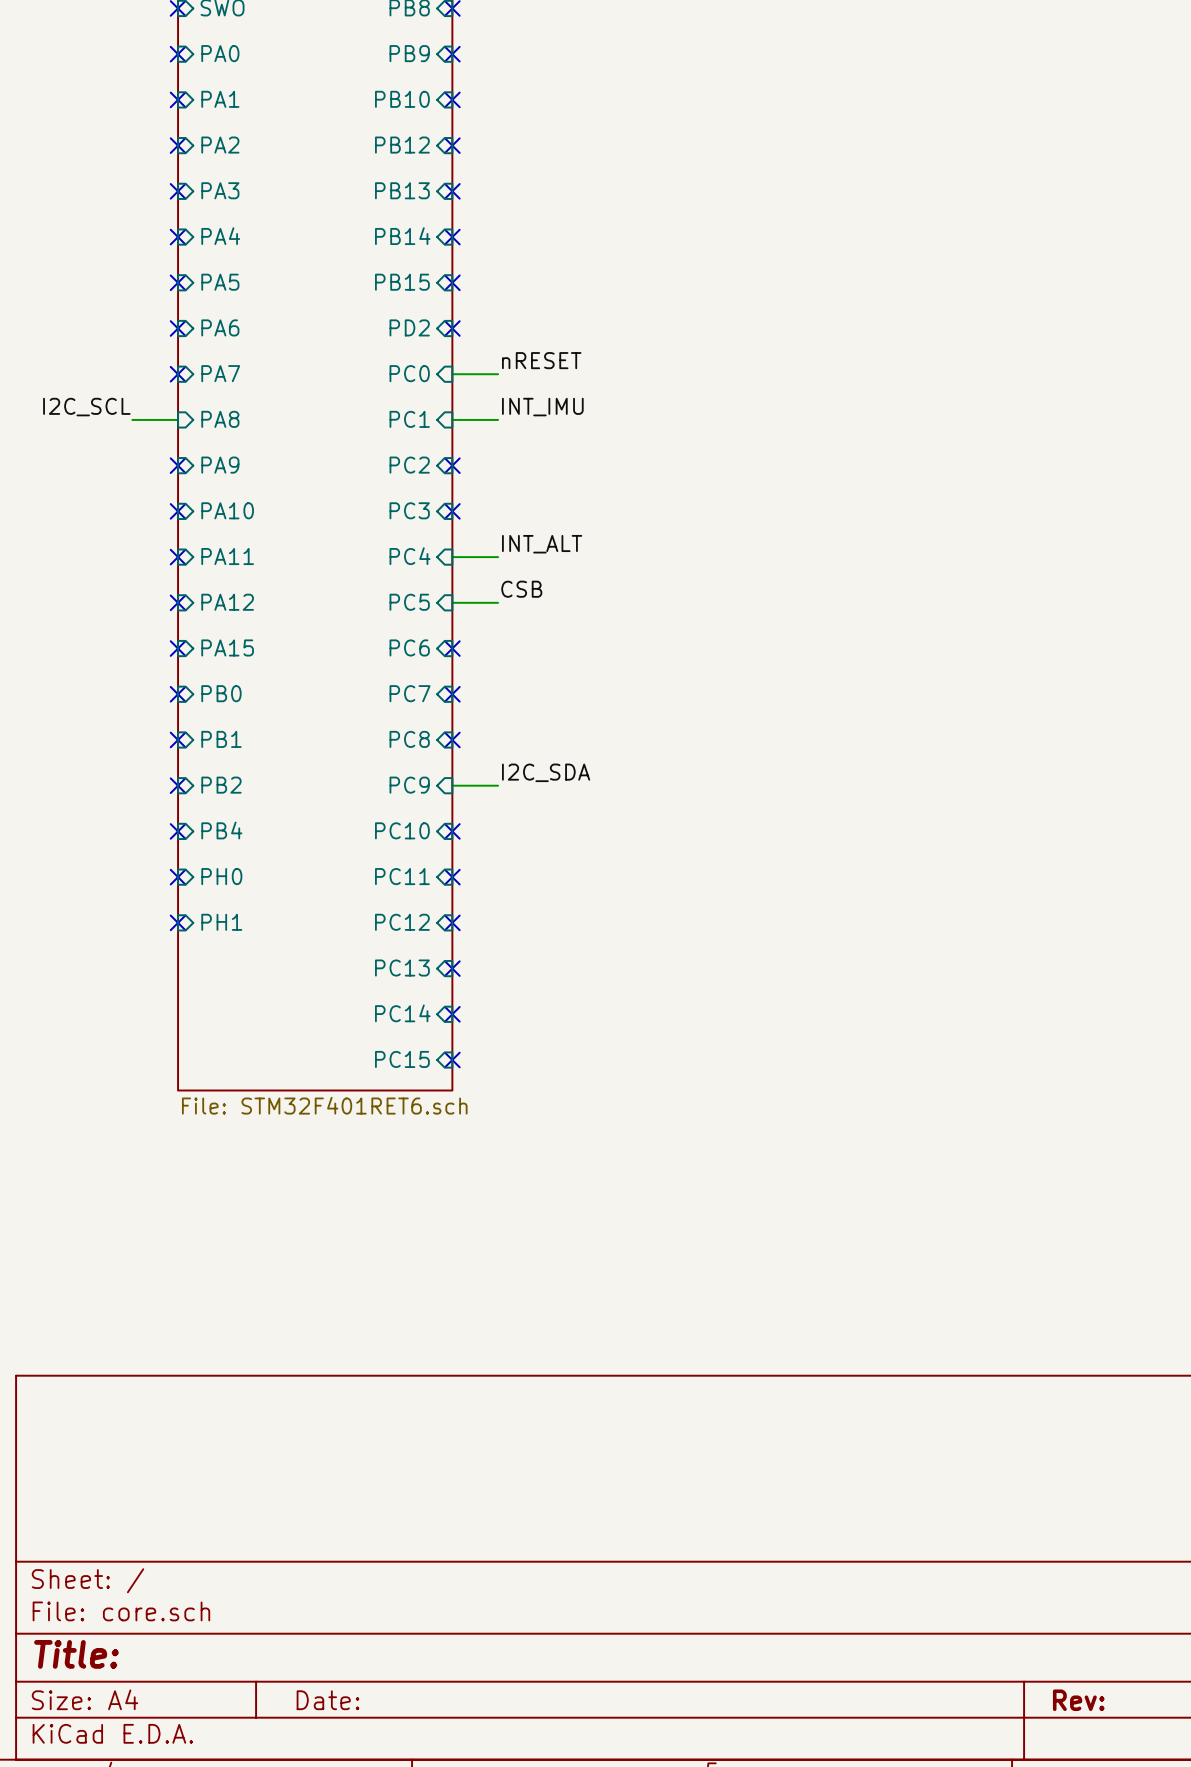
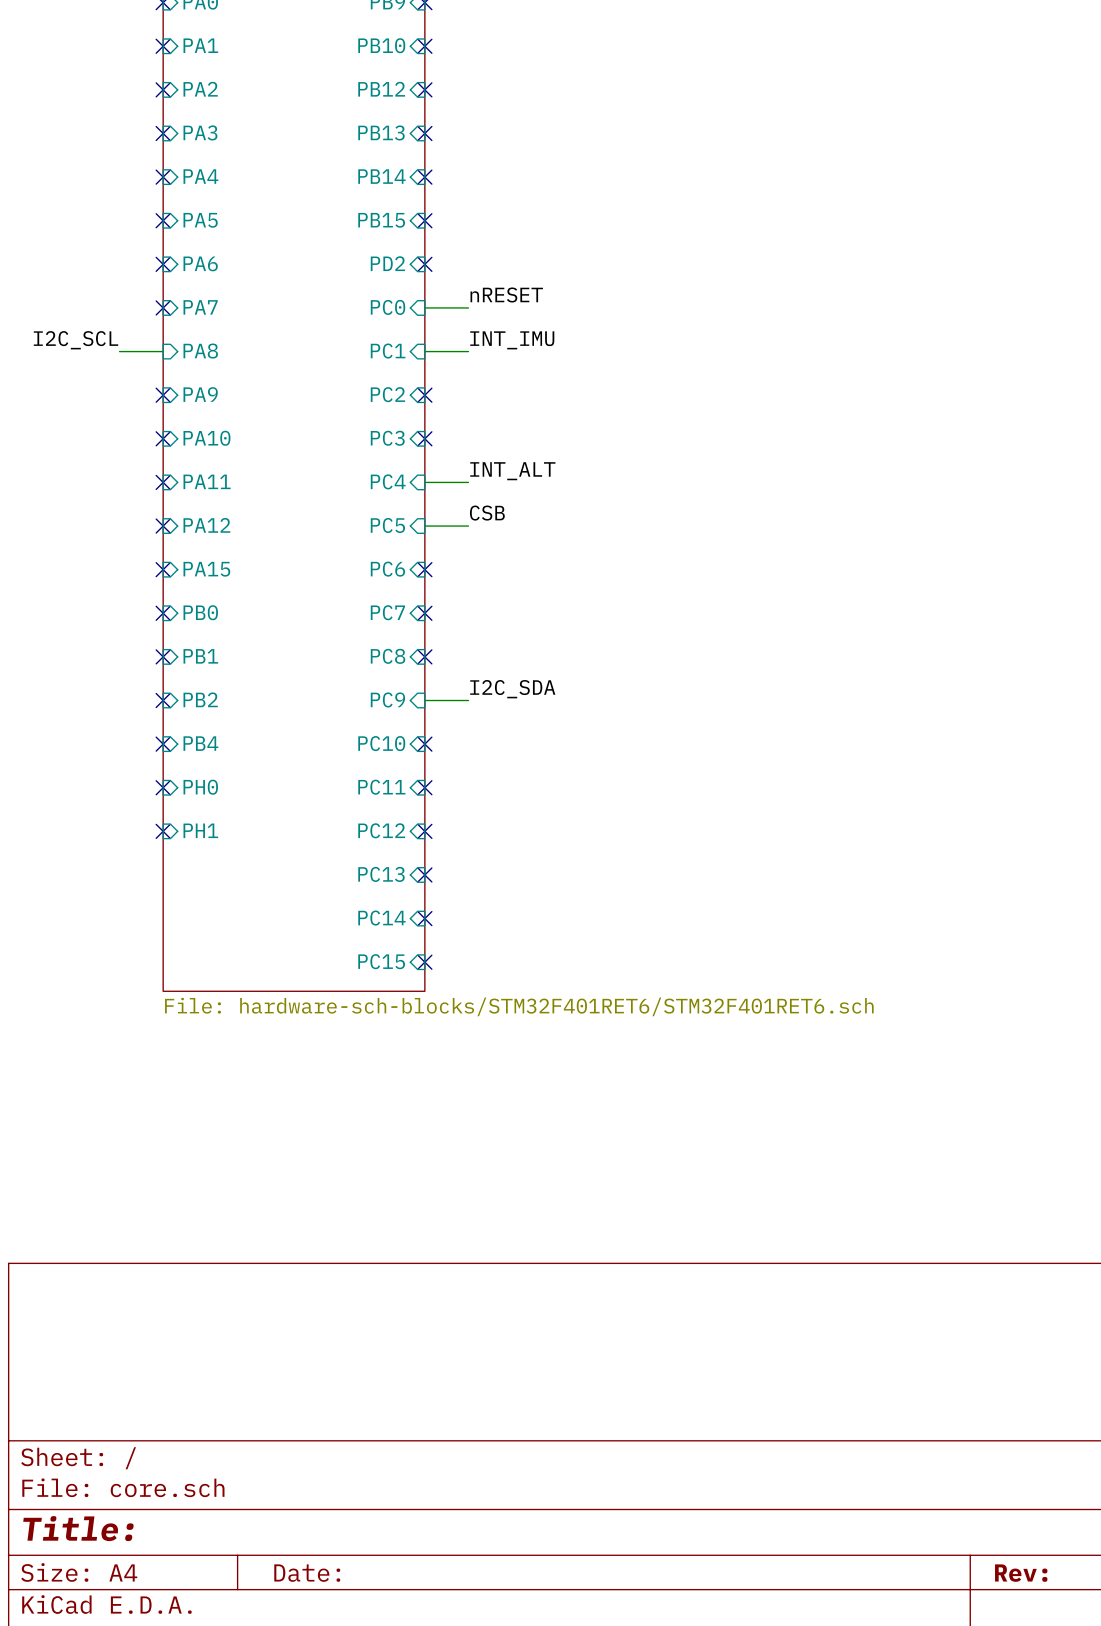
sheet value: File: STM32F401RET6.sch (324, 1105) -> File: hardware-sch-blocks/STM32F401RET6/STM32F401RET6.sch (519, 1006)

